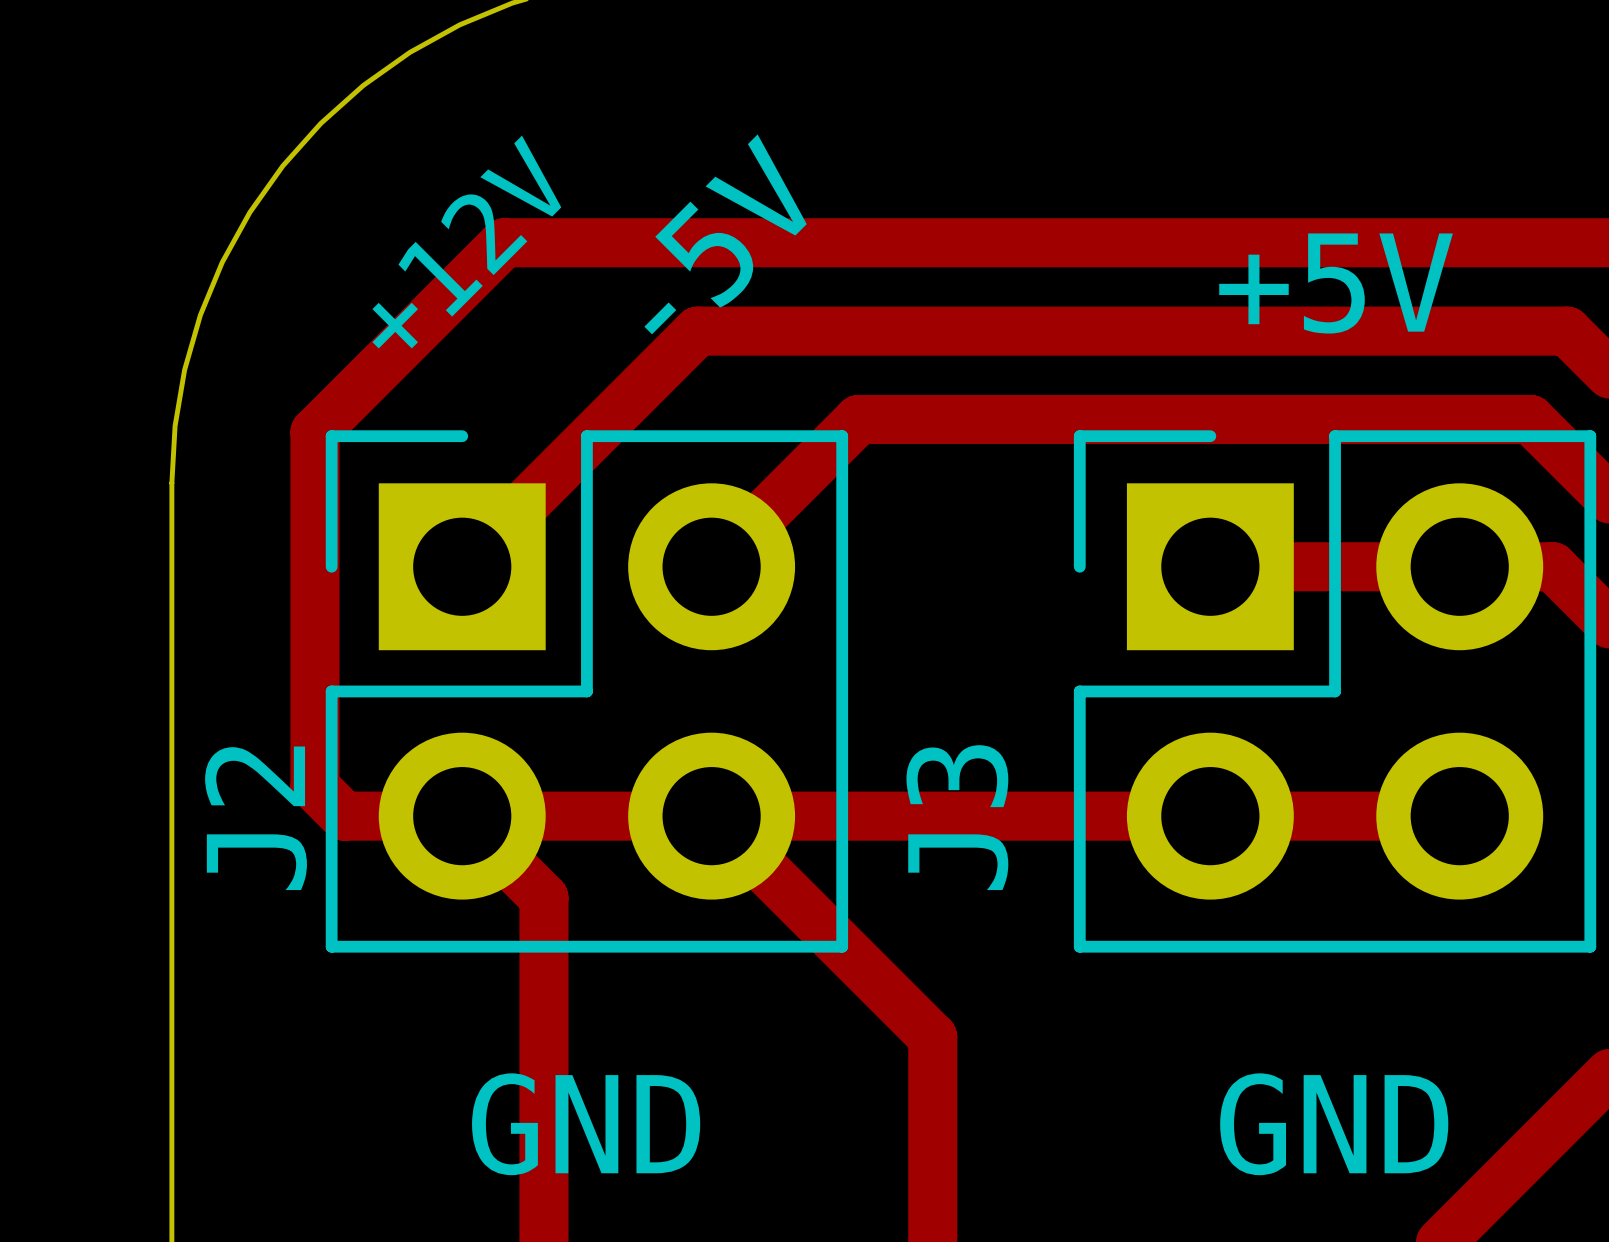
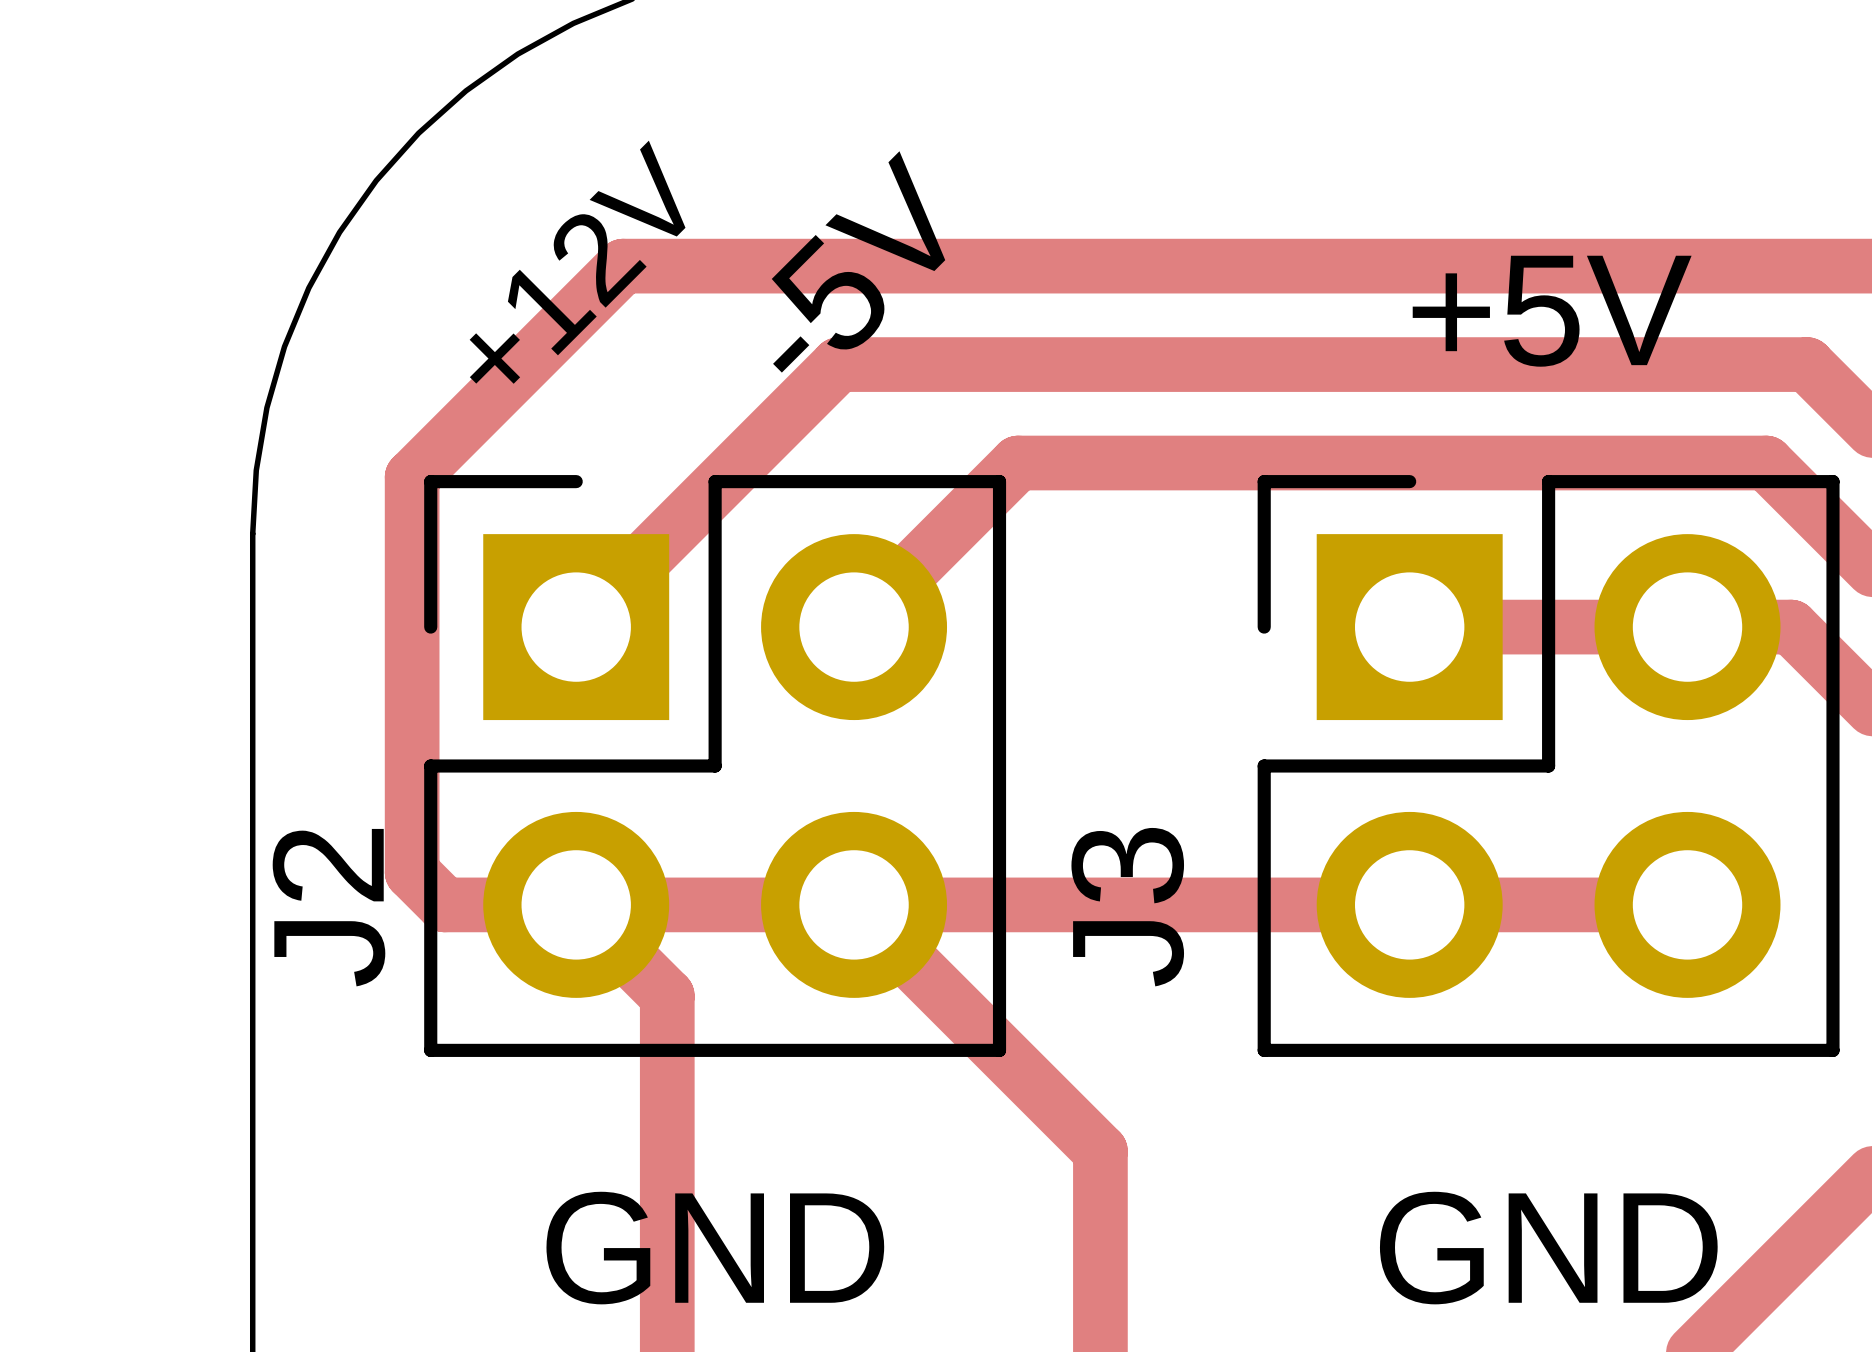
J2 name position: J2 (256, 818) -> J2 (328, 907)

